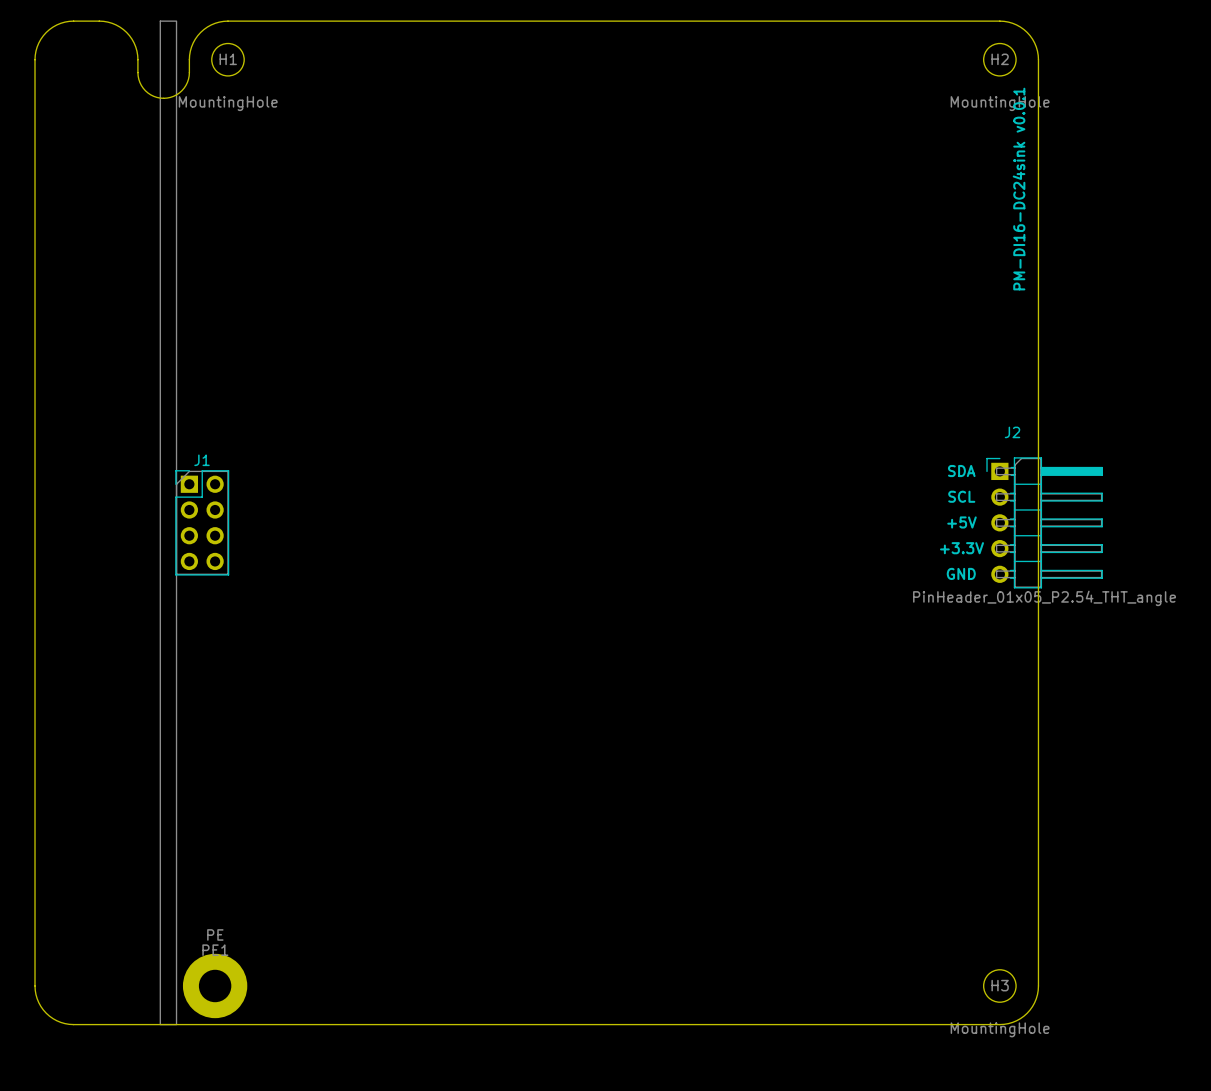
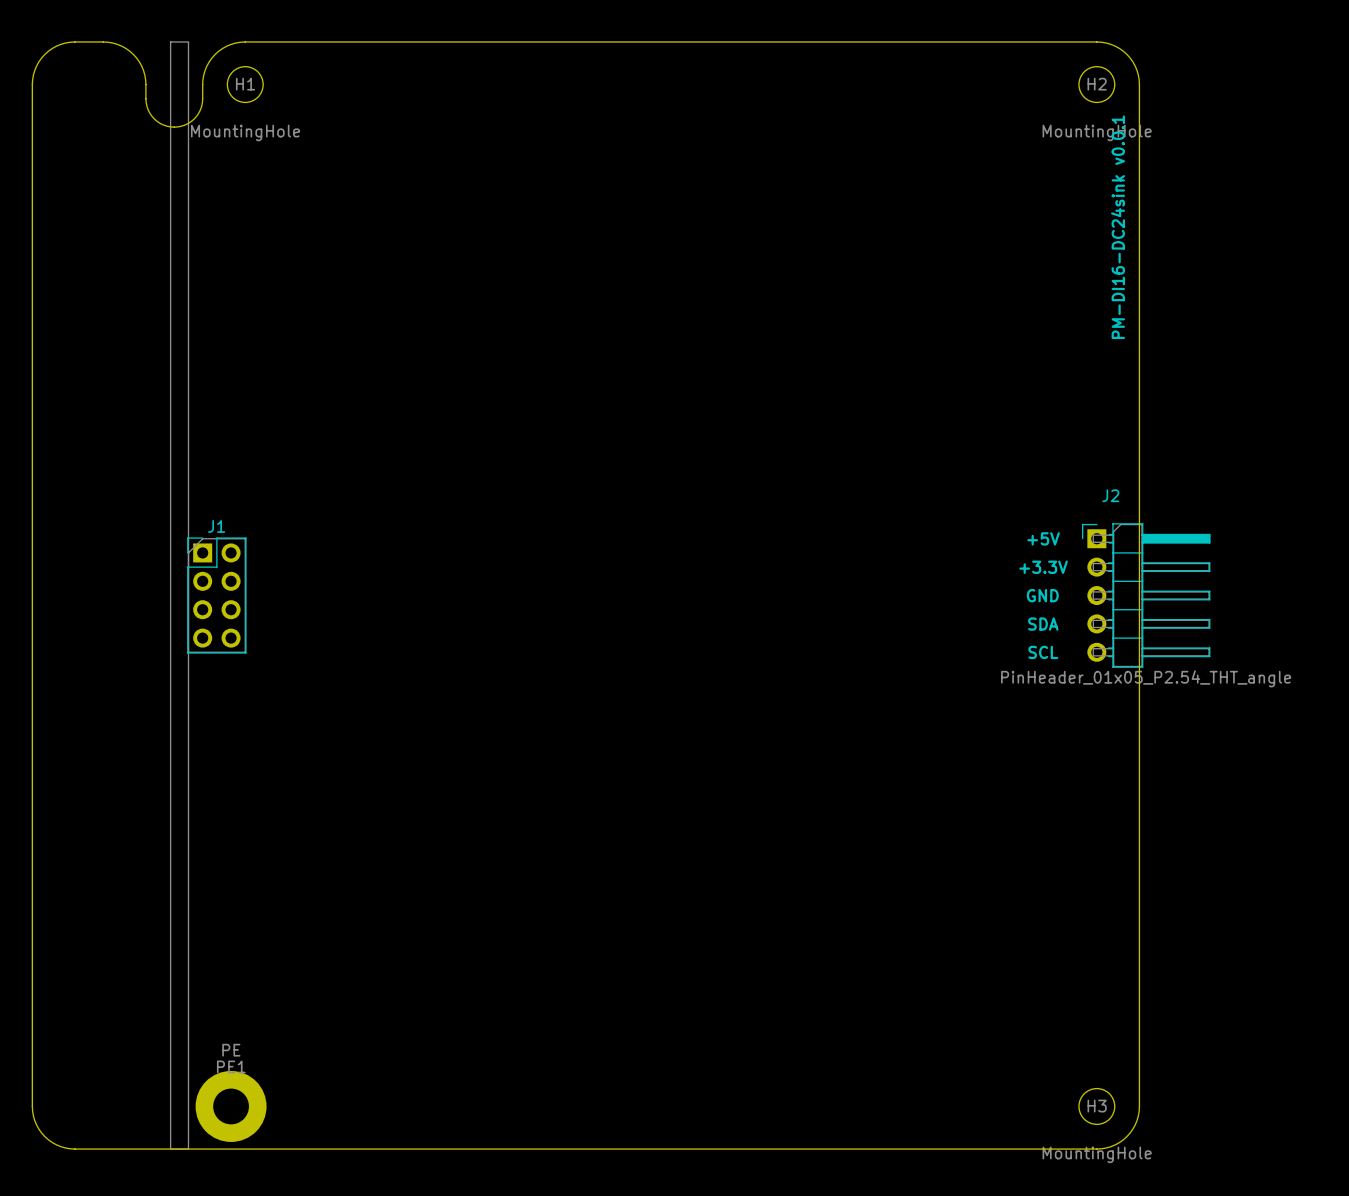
text position: SDA (961, 471) -> SDA (1043, 624)
text position: SCL (961, 496) -> SCL (1043, 652)
text position: +5V (961, 522) -> +5V (1043, 538)
text position: +3.3V (961, 548) -> +3.3V (1043, 567)
text position: GND (961, 573) -> GND (1042, 595)

